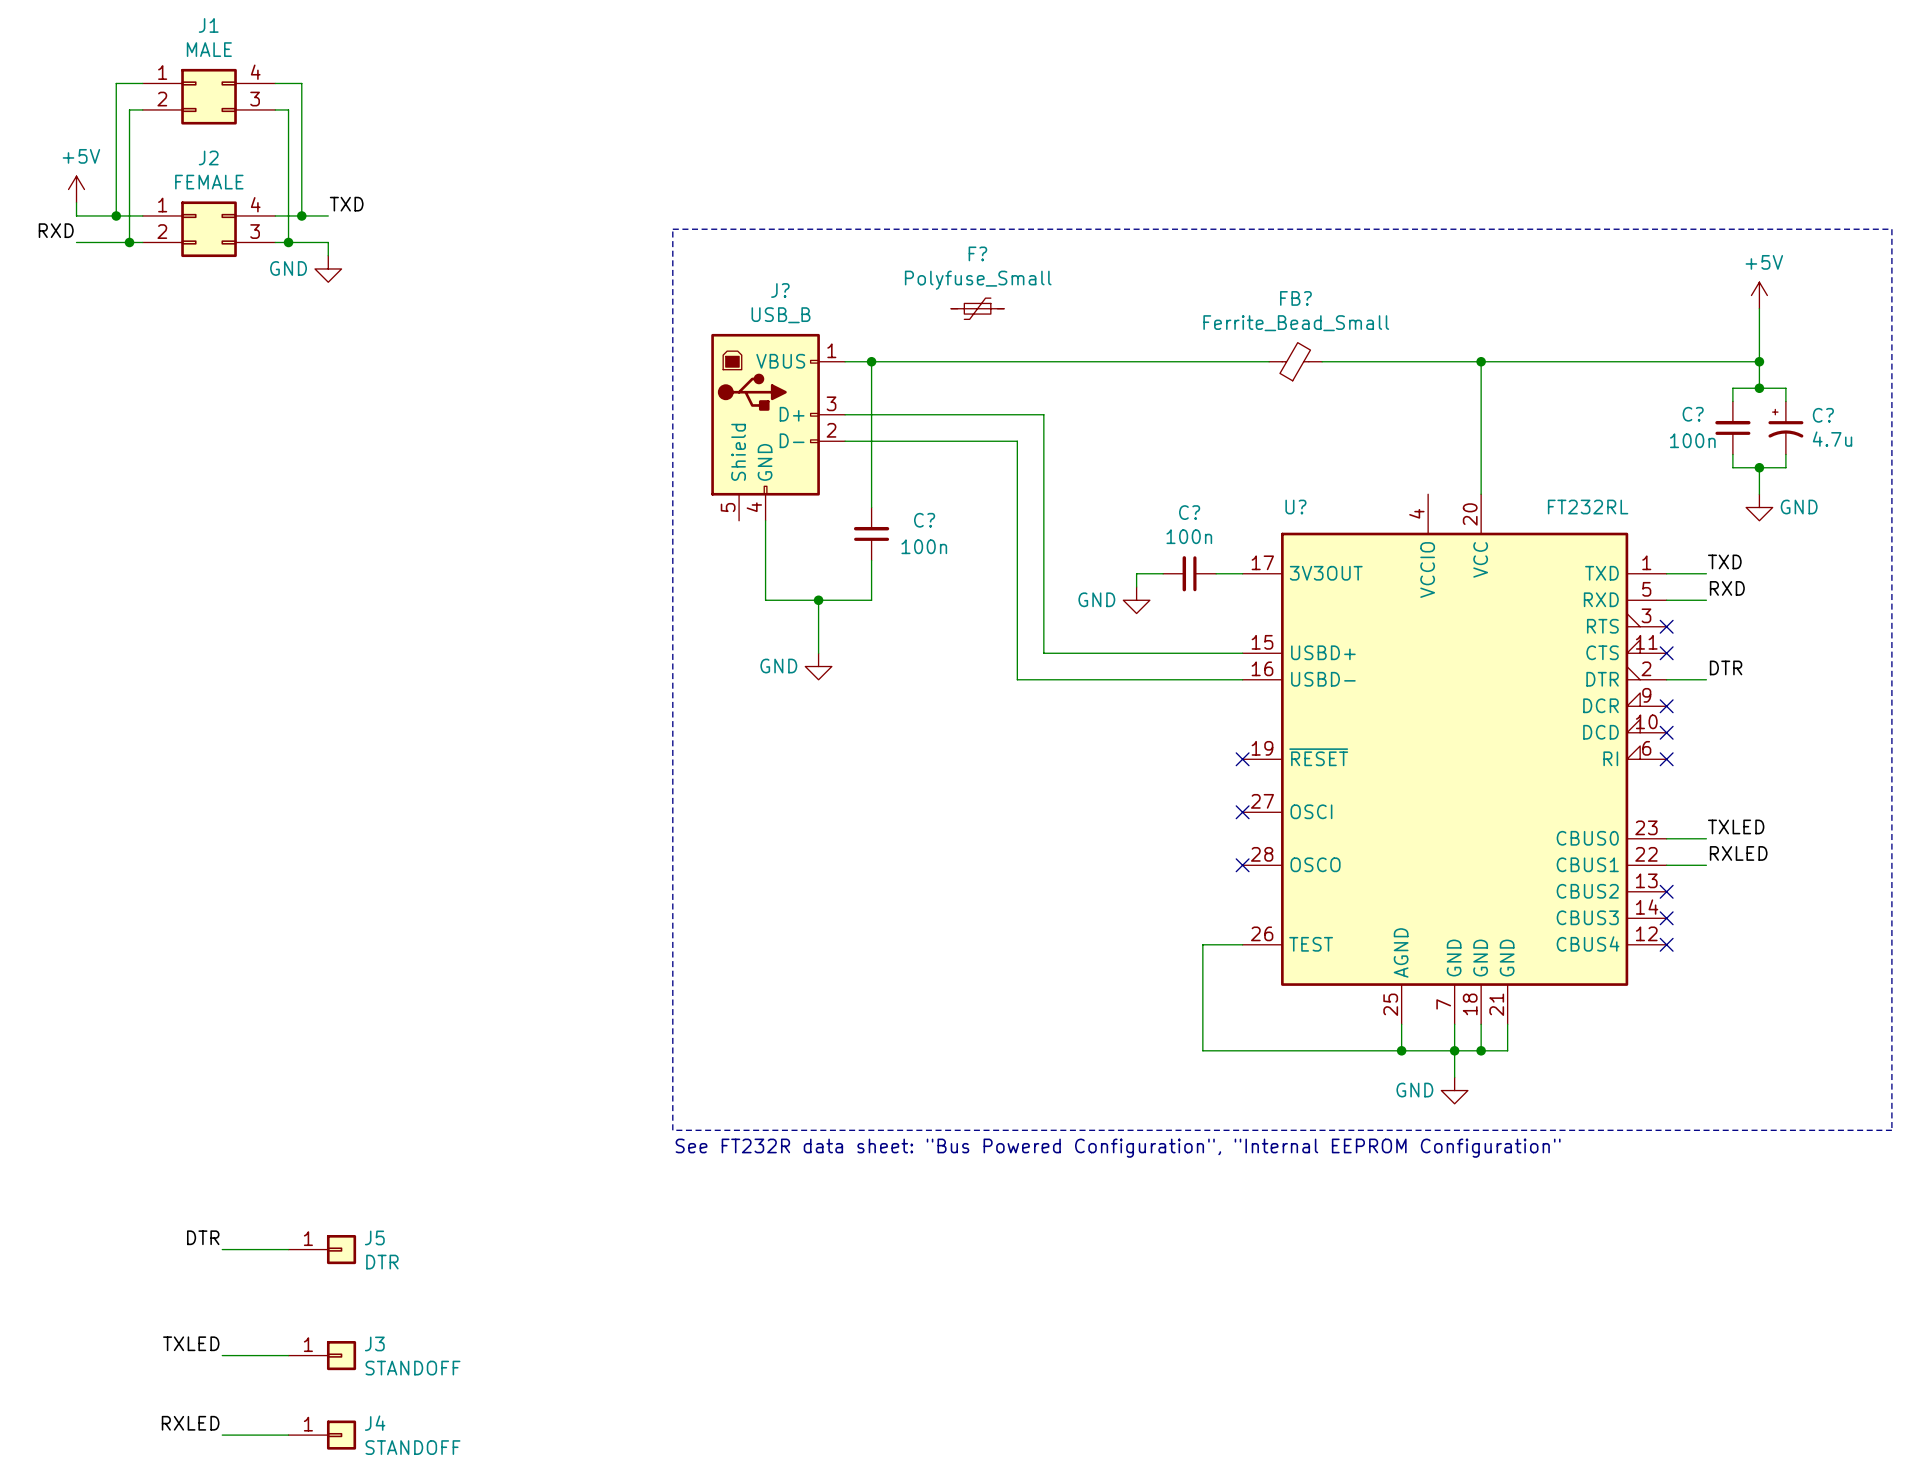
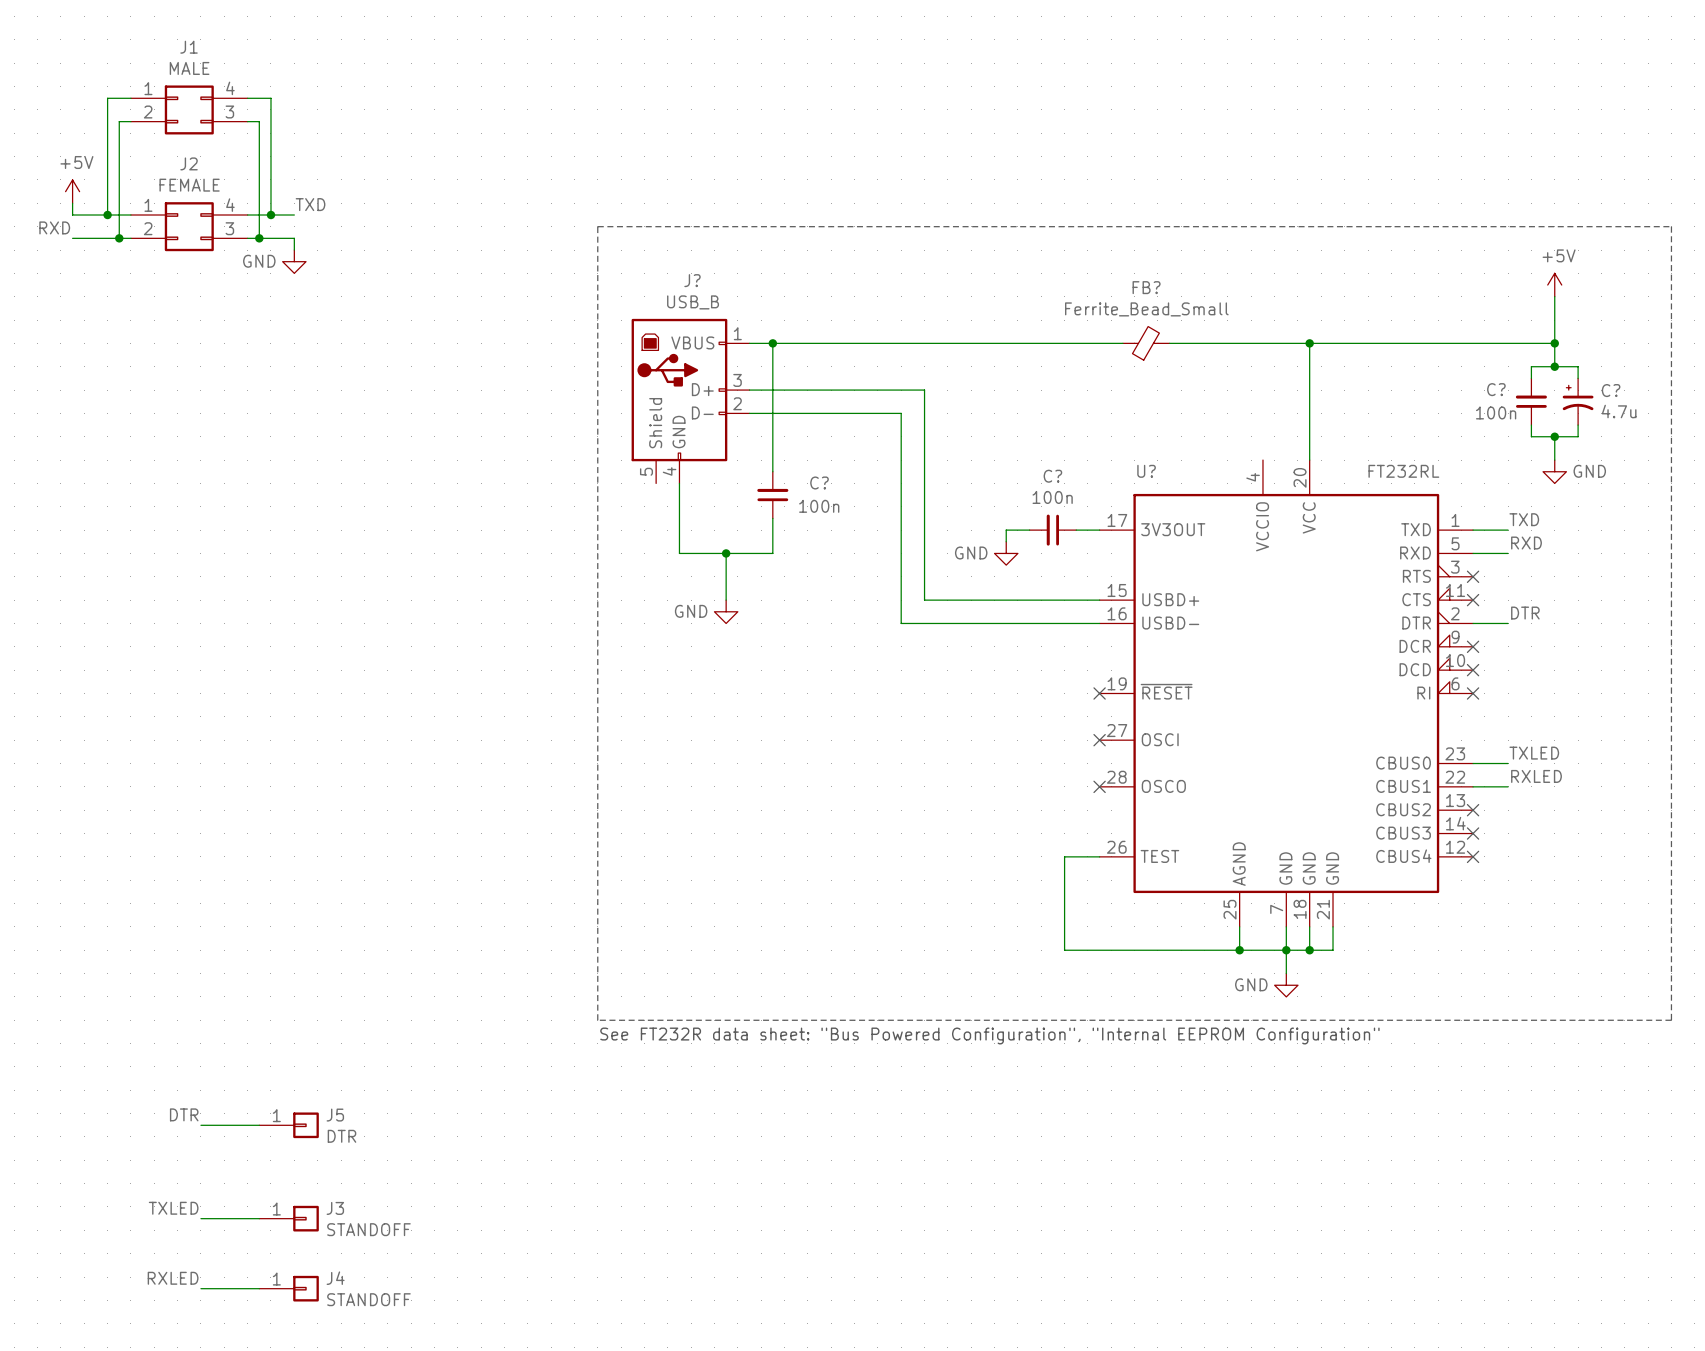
F?: Polyfuse_Small (977, 308) -> none

